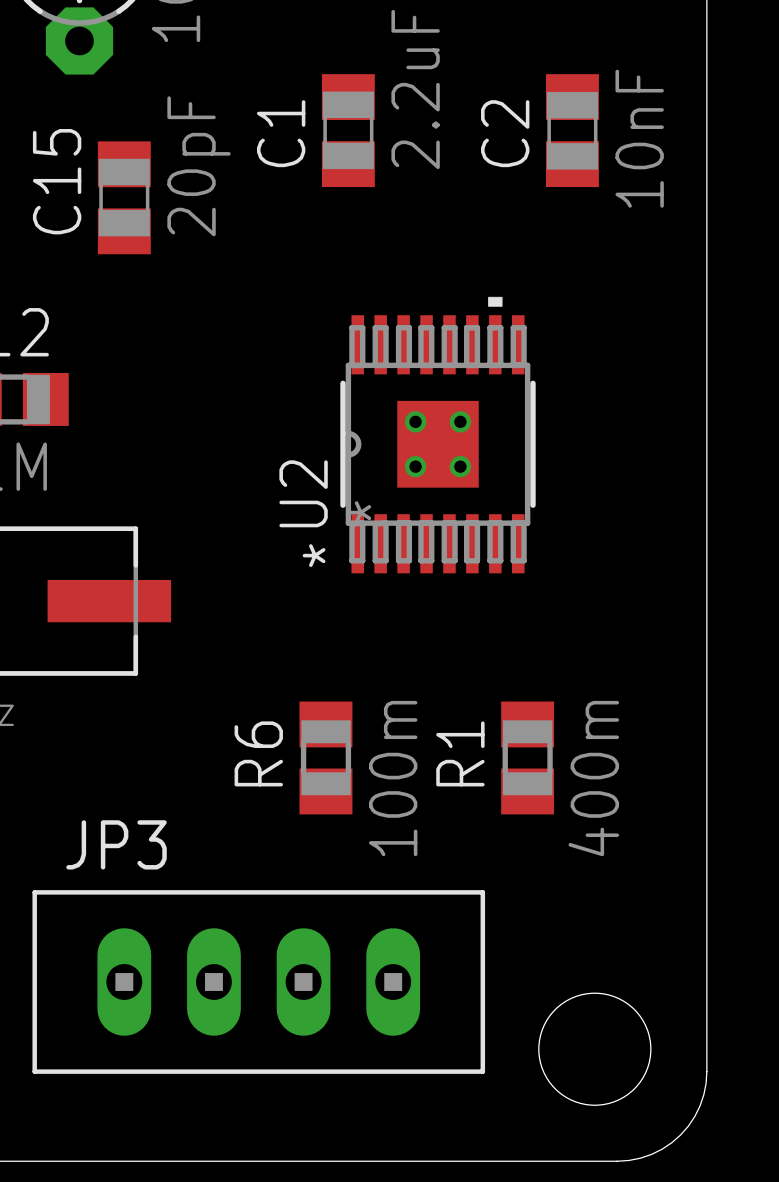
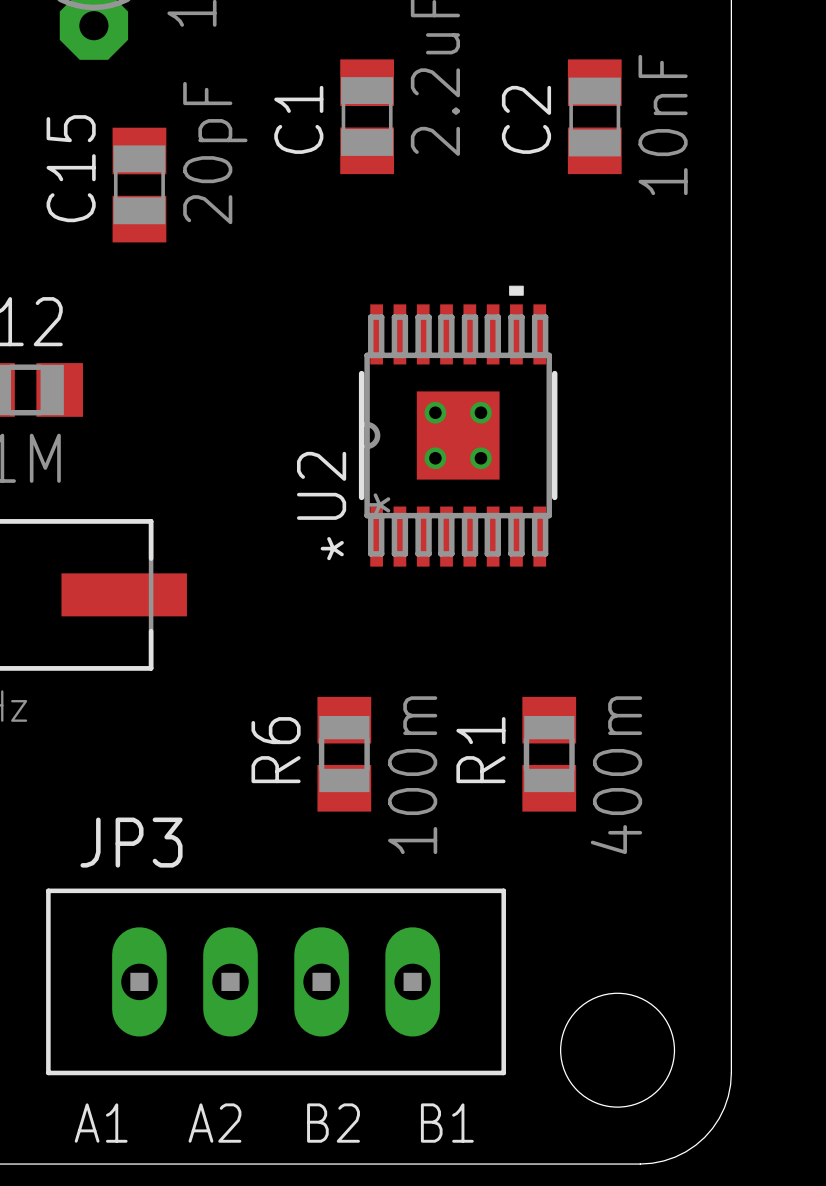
text: none -> A1 (101, 1123)
text: none -> A2 (214, 1123)
text: none -> B2 (333, 1123)
text: none -> B1 (447, 1123)

